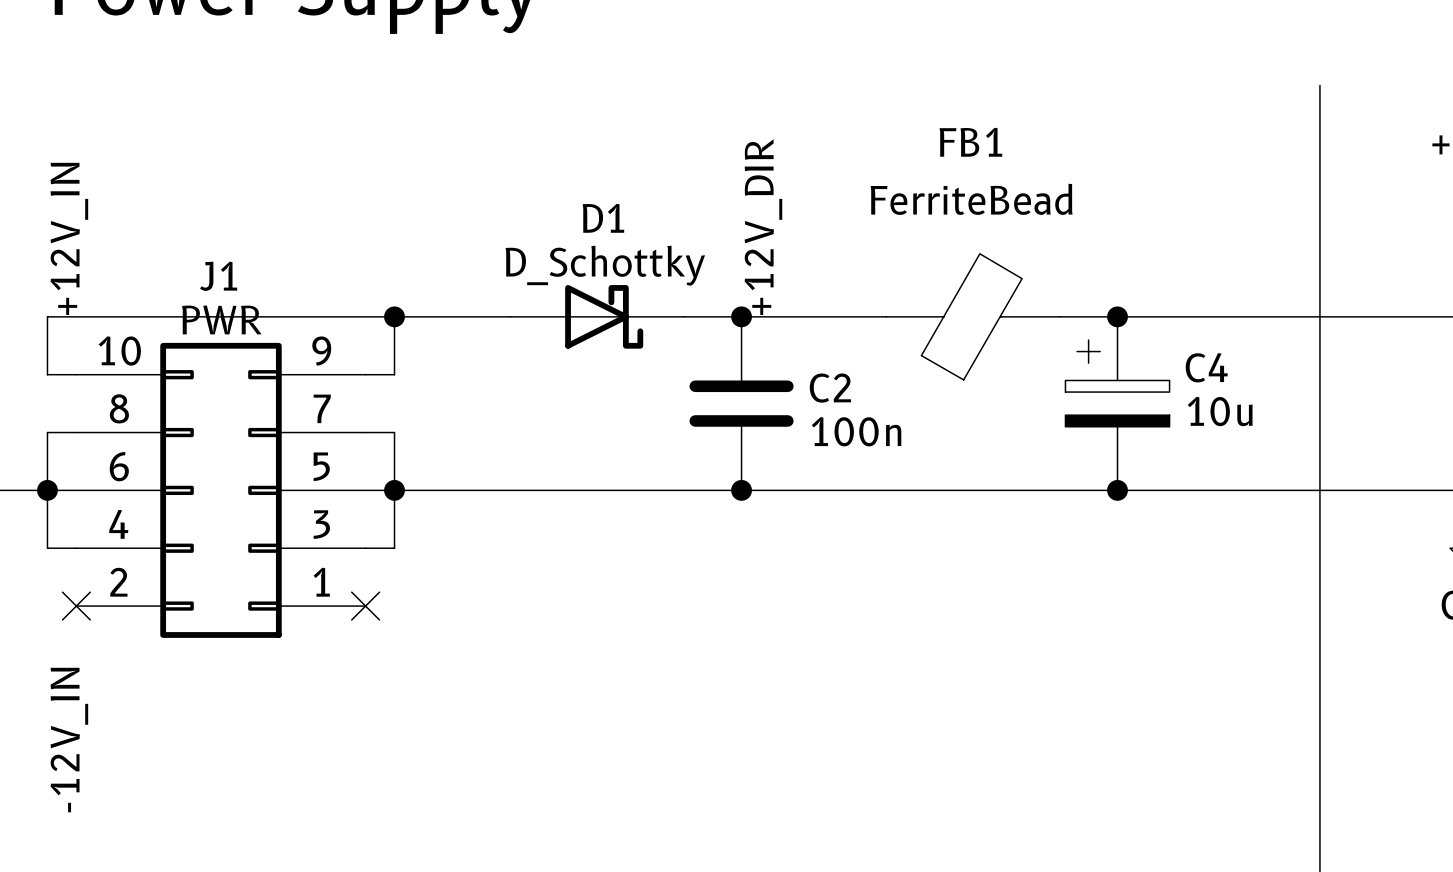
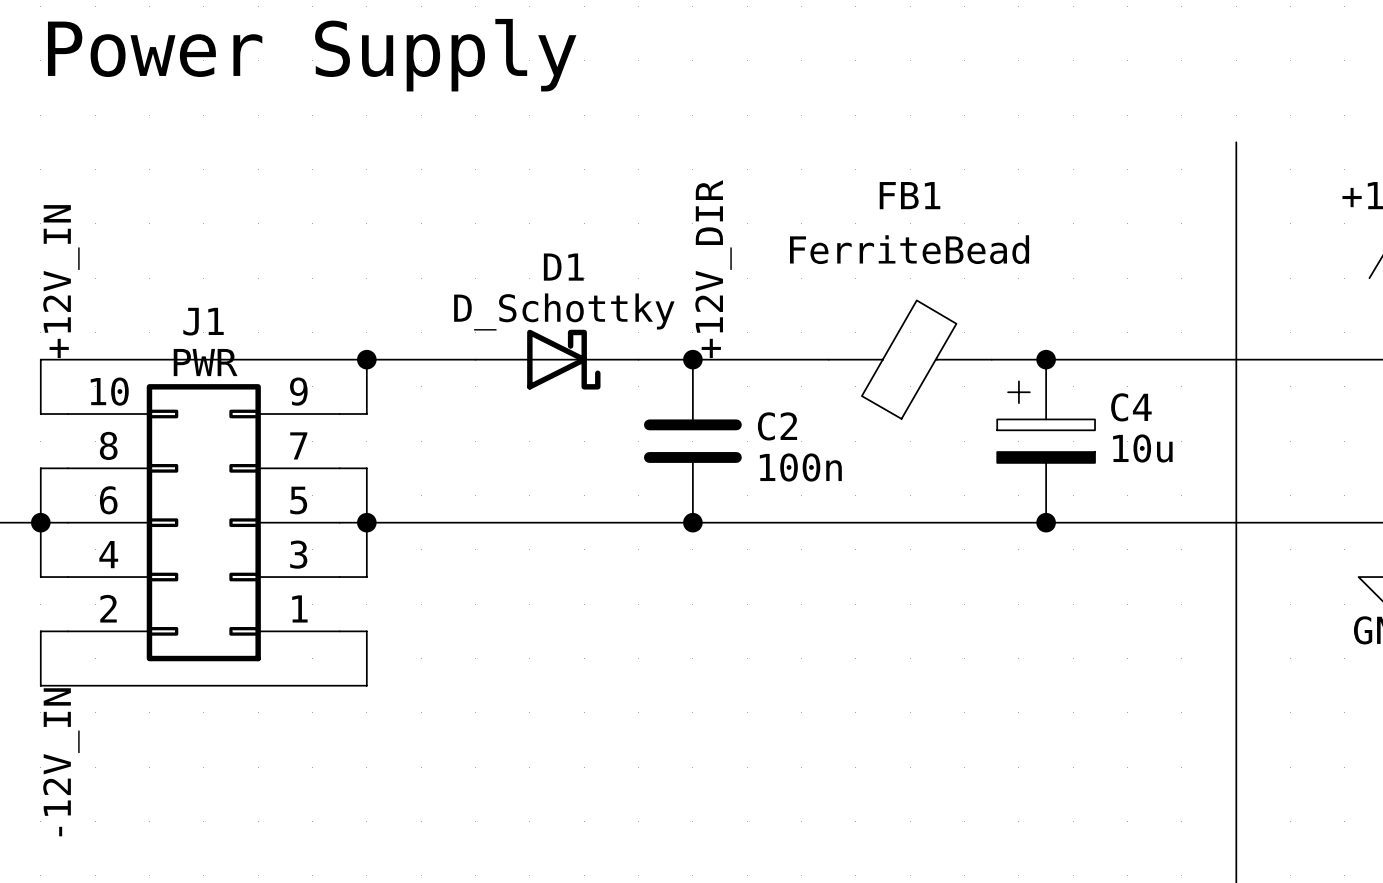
wire: none -> (67, 631) (40, 631) (40, 685) (366, 685) (366, 631) (339, 631)
no-connect mark: (76, 606) -> none
no-connect mark: (365, 606) -> none

